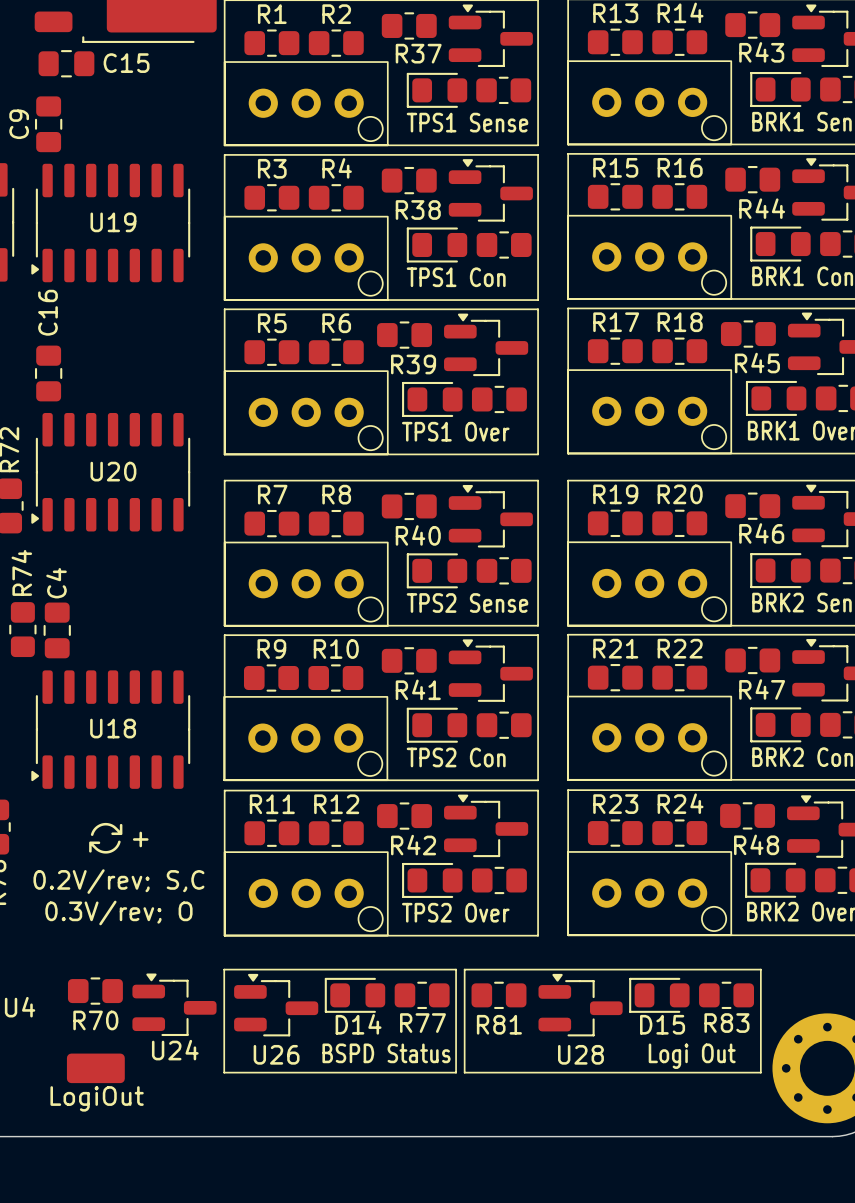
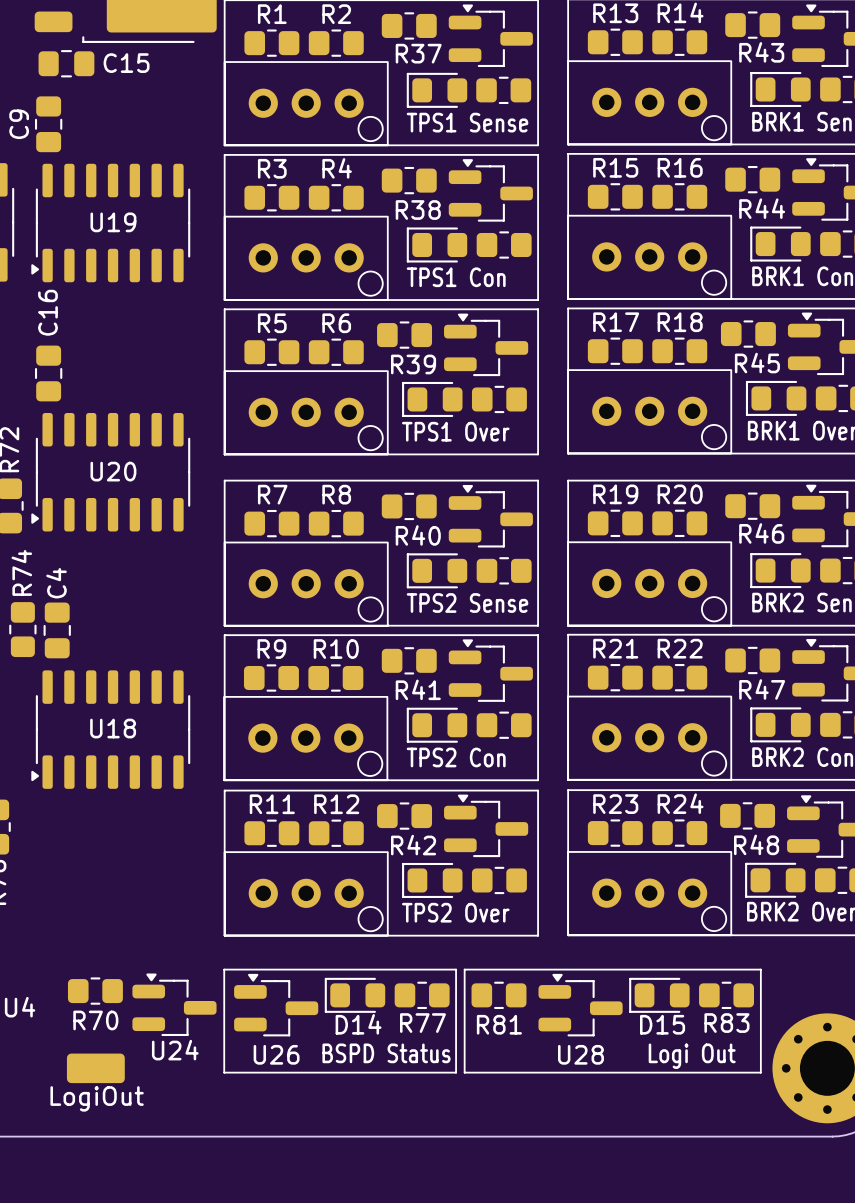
drawing: [89, 822, 123, 854] -> none
text: + (140, 839) -> none
text: 0.2V/rev; S,C (118, 881) -> none
text: 0.3V/rev; O (118, 912) -> none

